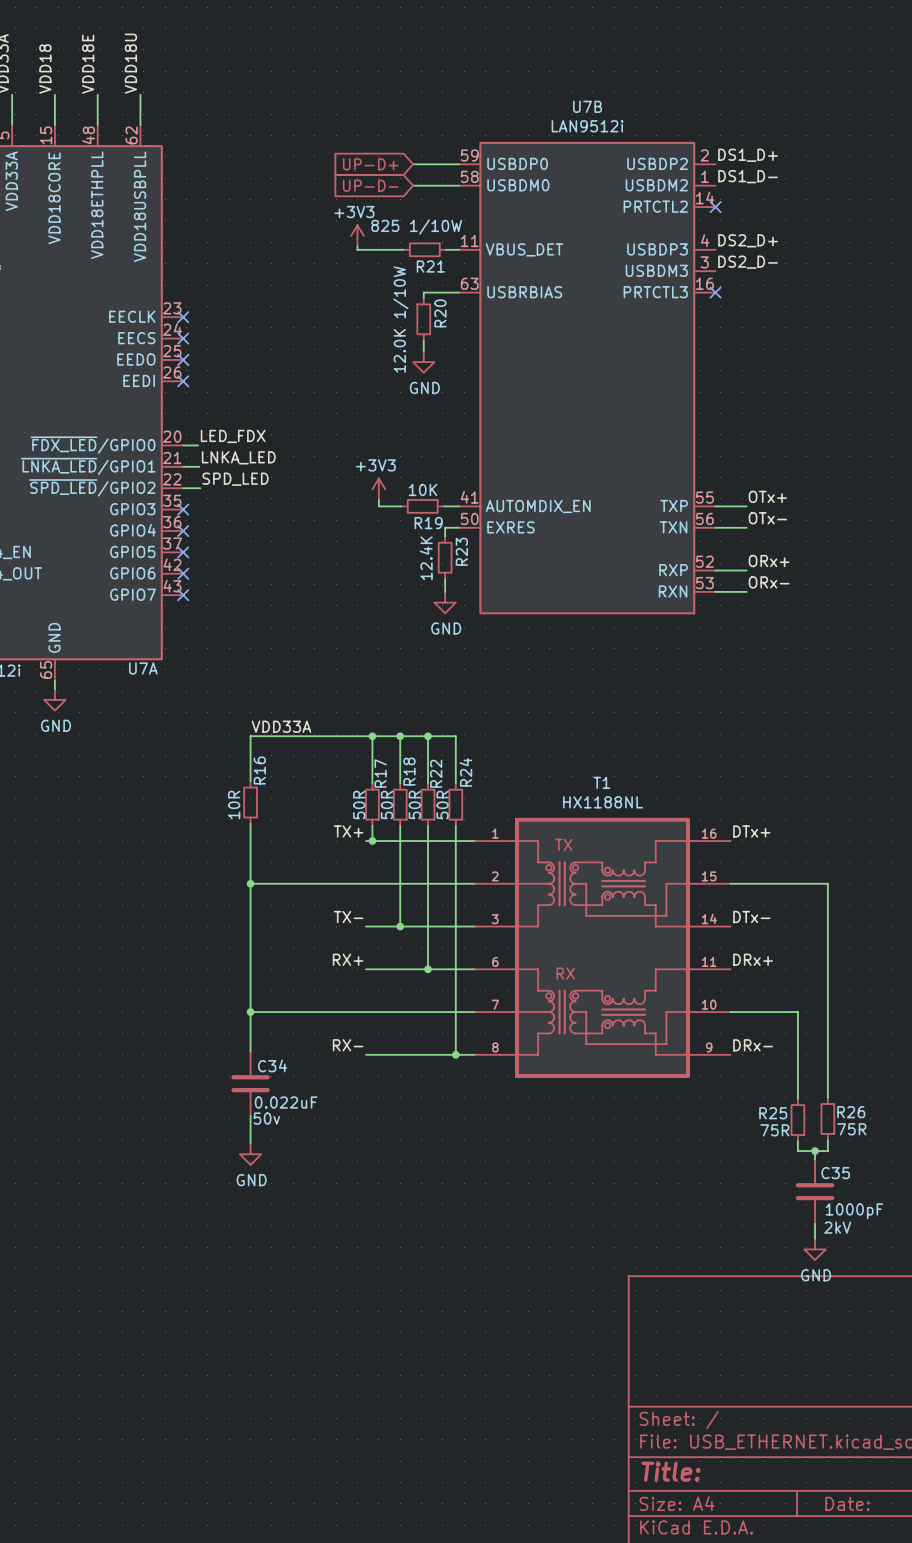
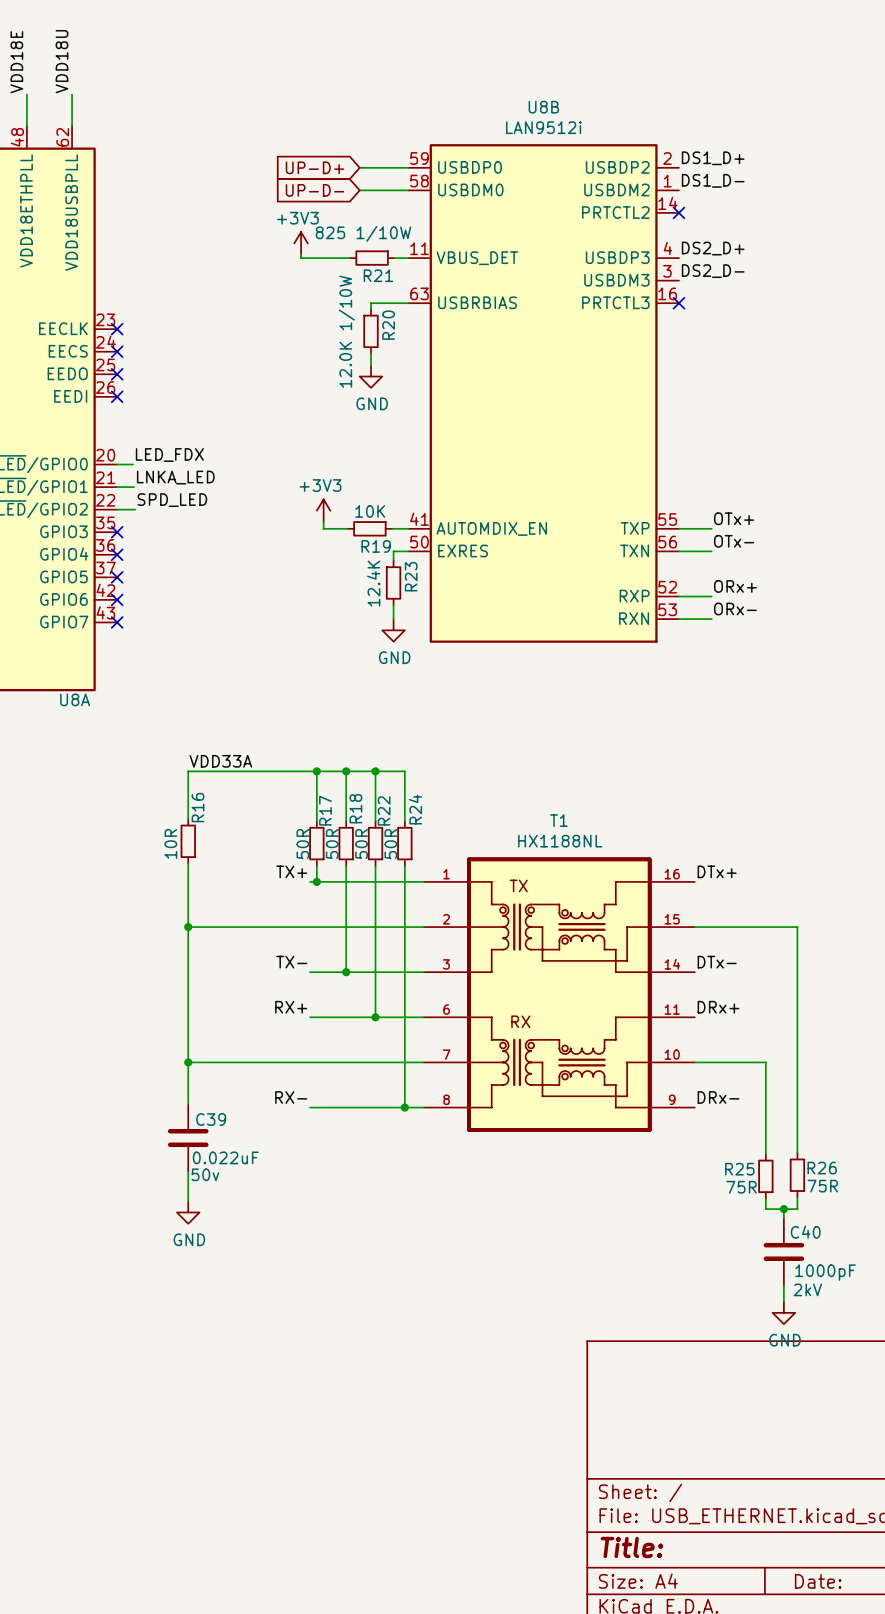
U7B name: U7B (587, 106) -> U8B (543, 107)
U7A name: U7A (143, 668) -> U8A (75, 699)
C34 name: C34 (272, 1065) -> C39 (211, 1119)
C35 name: C35 (835, 1173) -> C40 (805, 1232)

